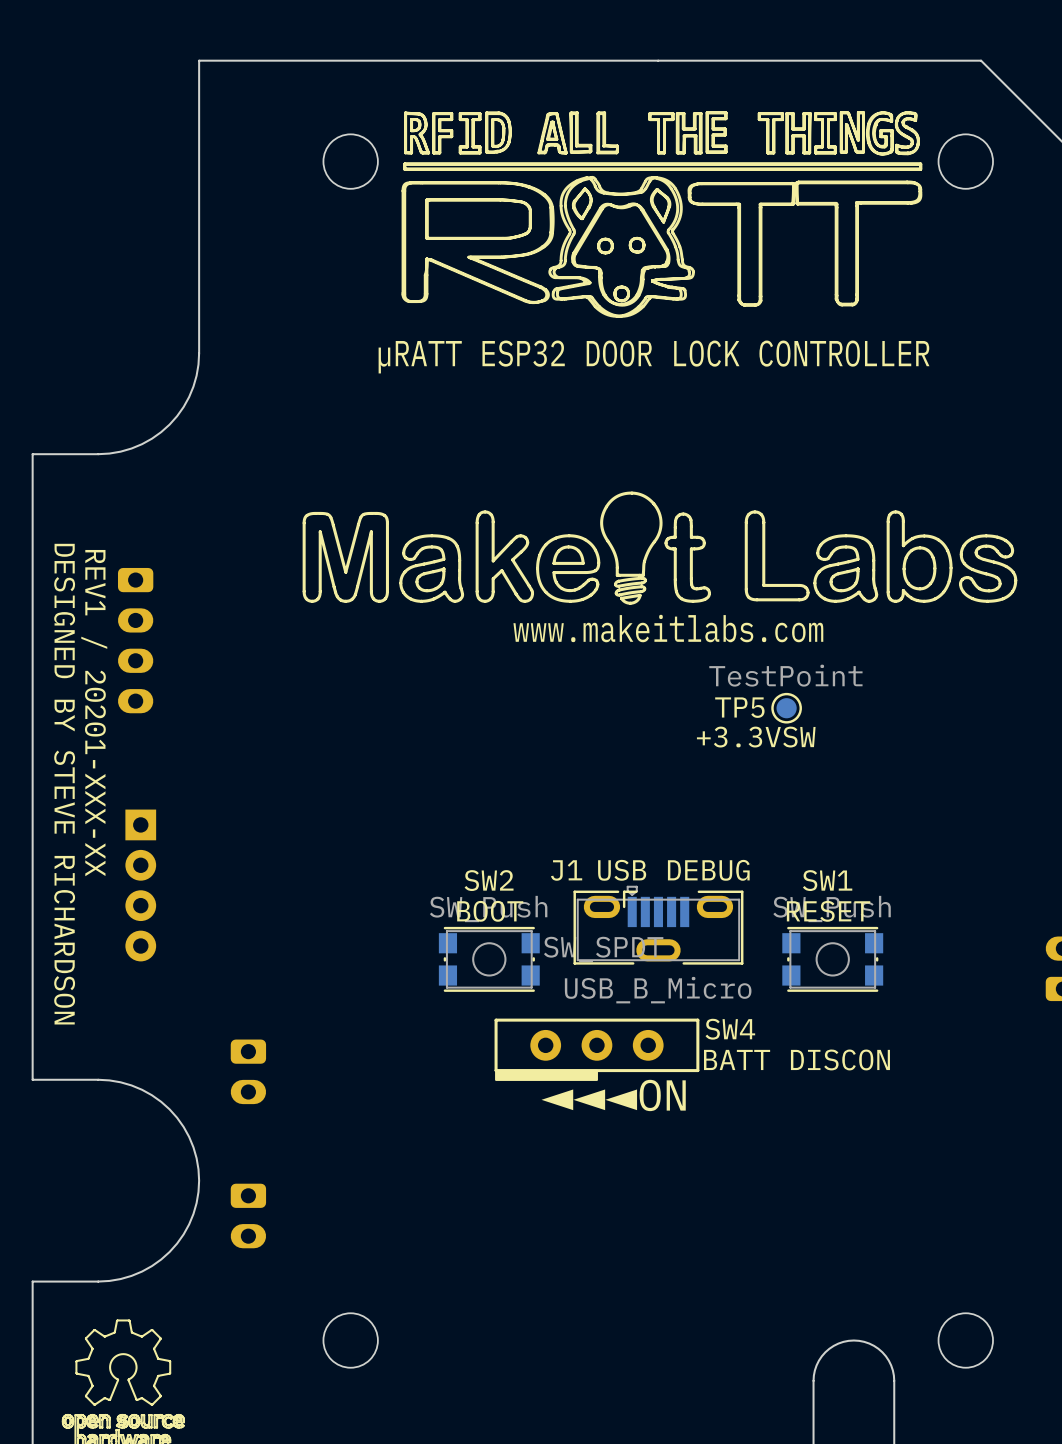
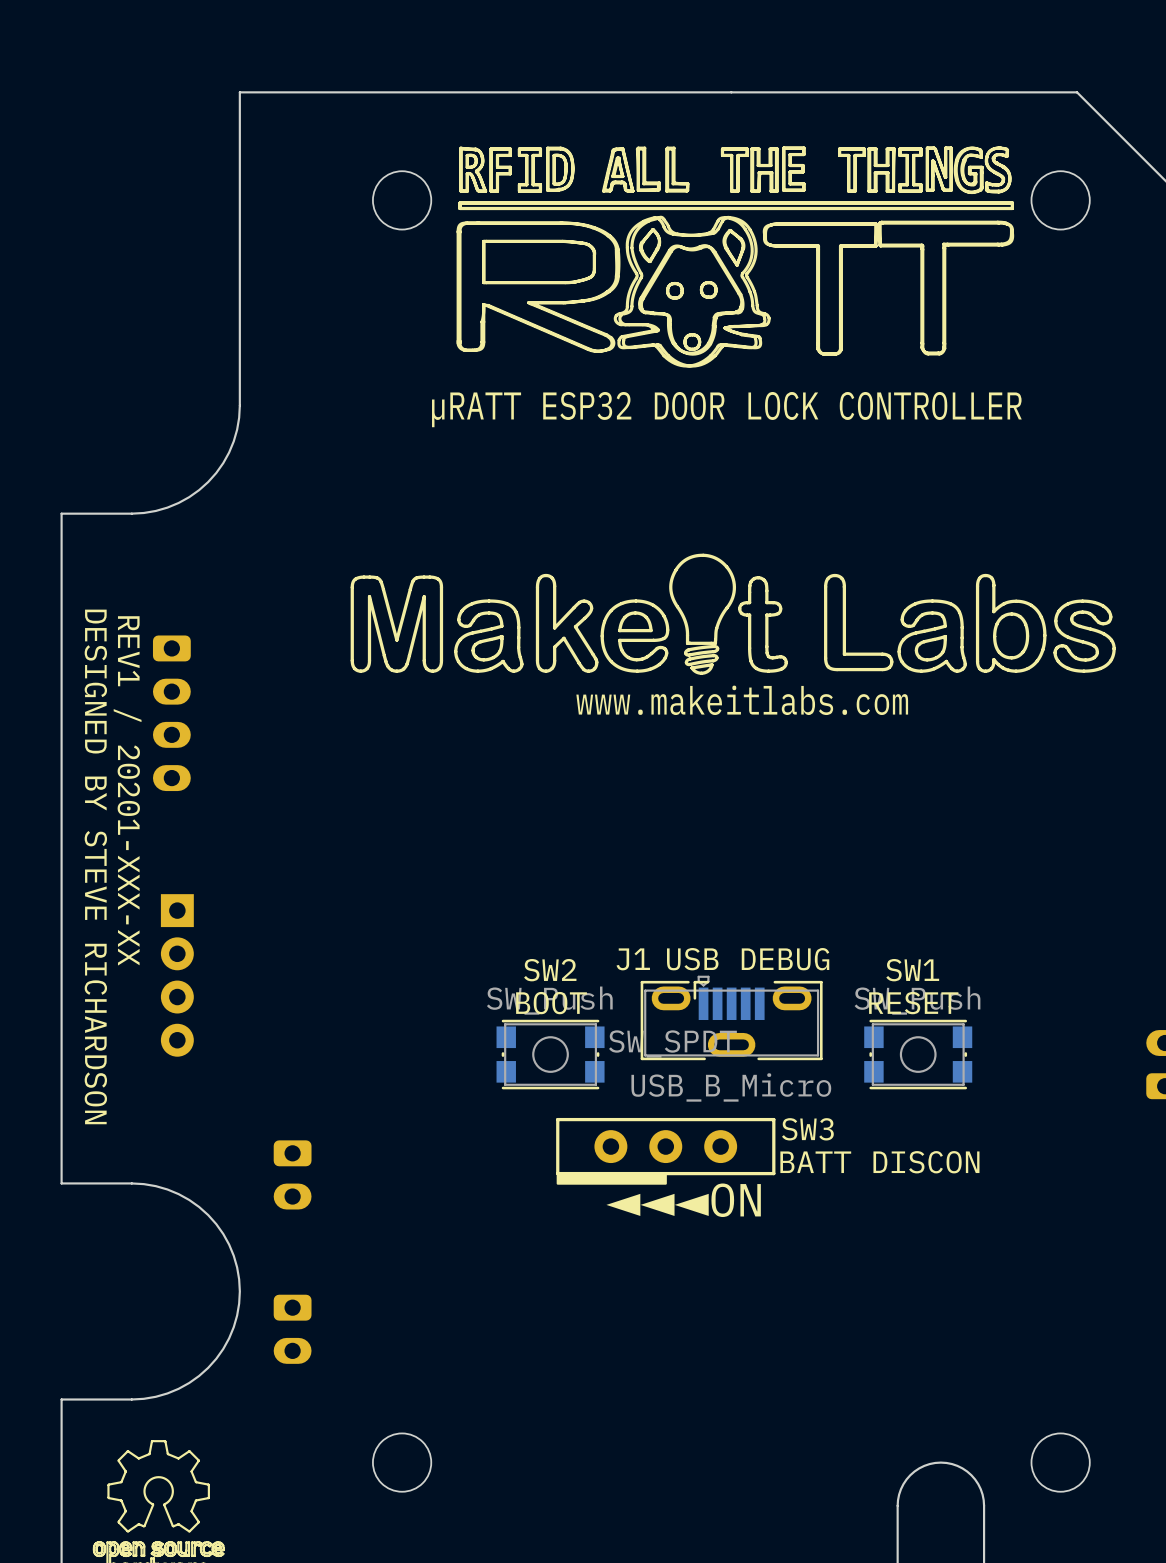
TP5: TestPoint (786, 708) -> none
text: +3.3VSW (756, 737) -> none
SW4 name: SW4 (730, 1029) -> SW3 (807, 1129)

